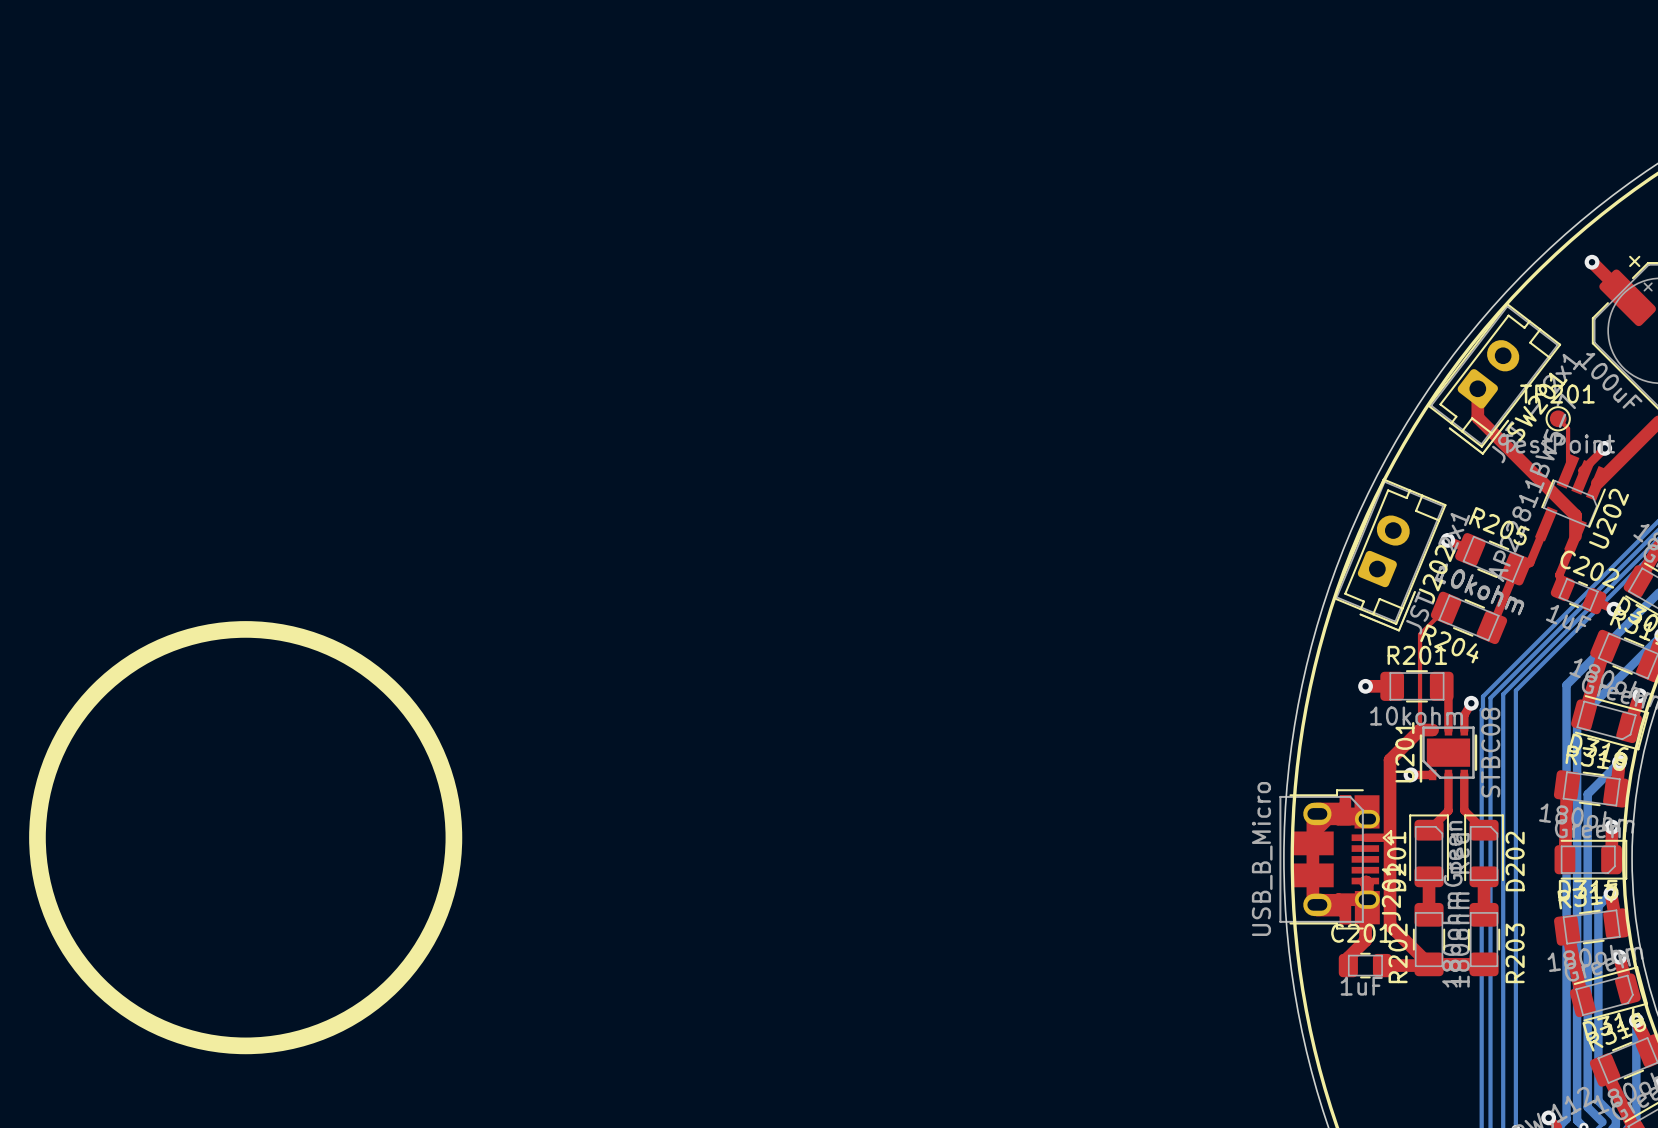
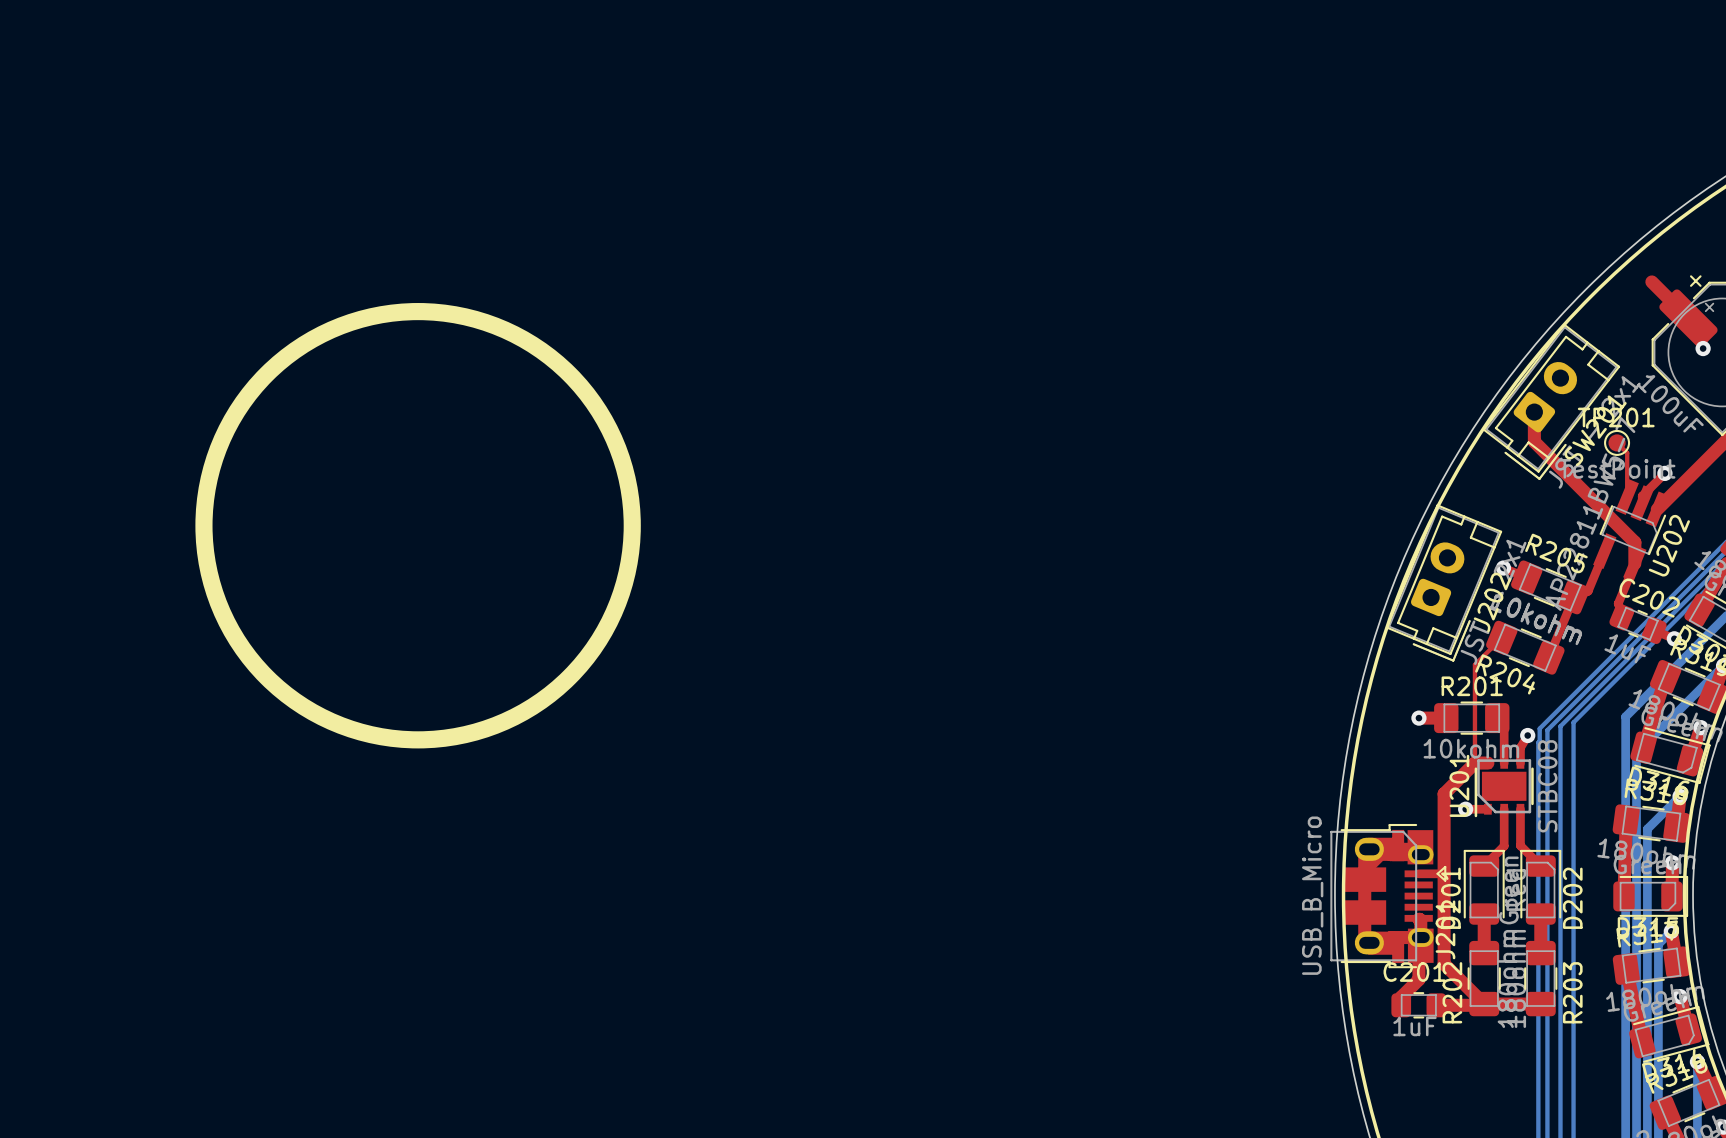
via: (1592, 262) -> none
via: none -> (1703, 348)
drawing position: (245, 837) -> (418, 525)

